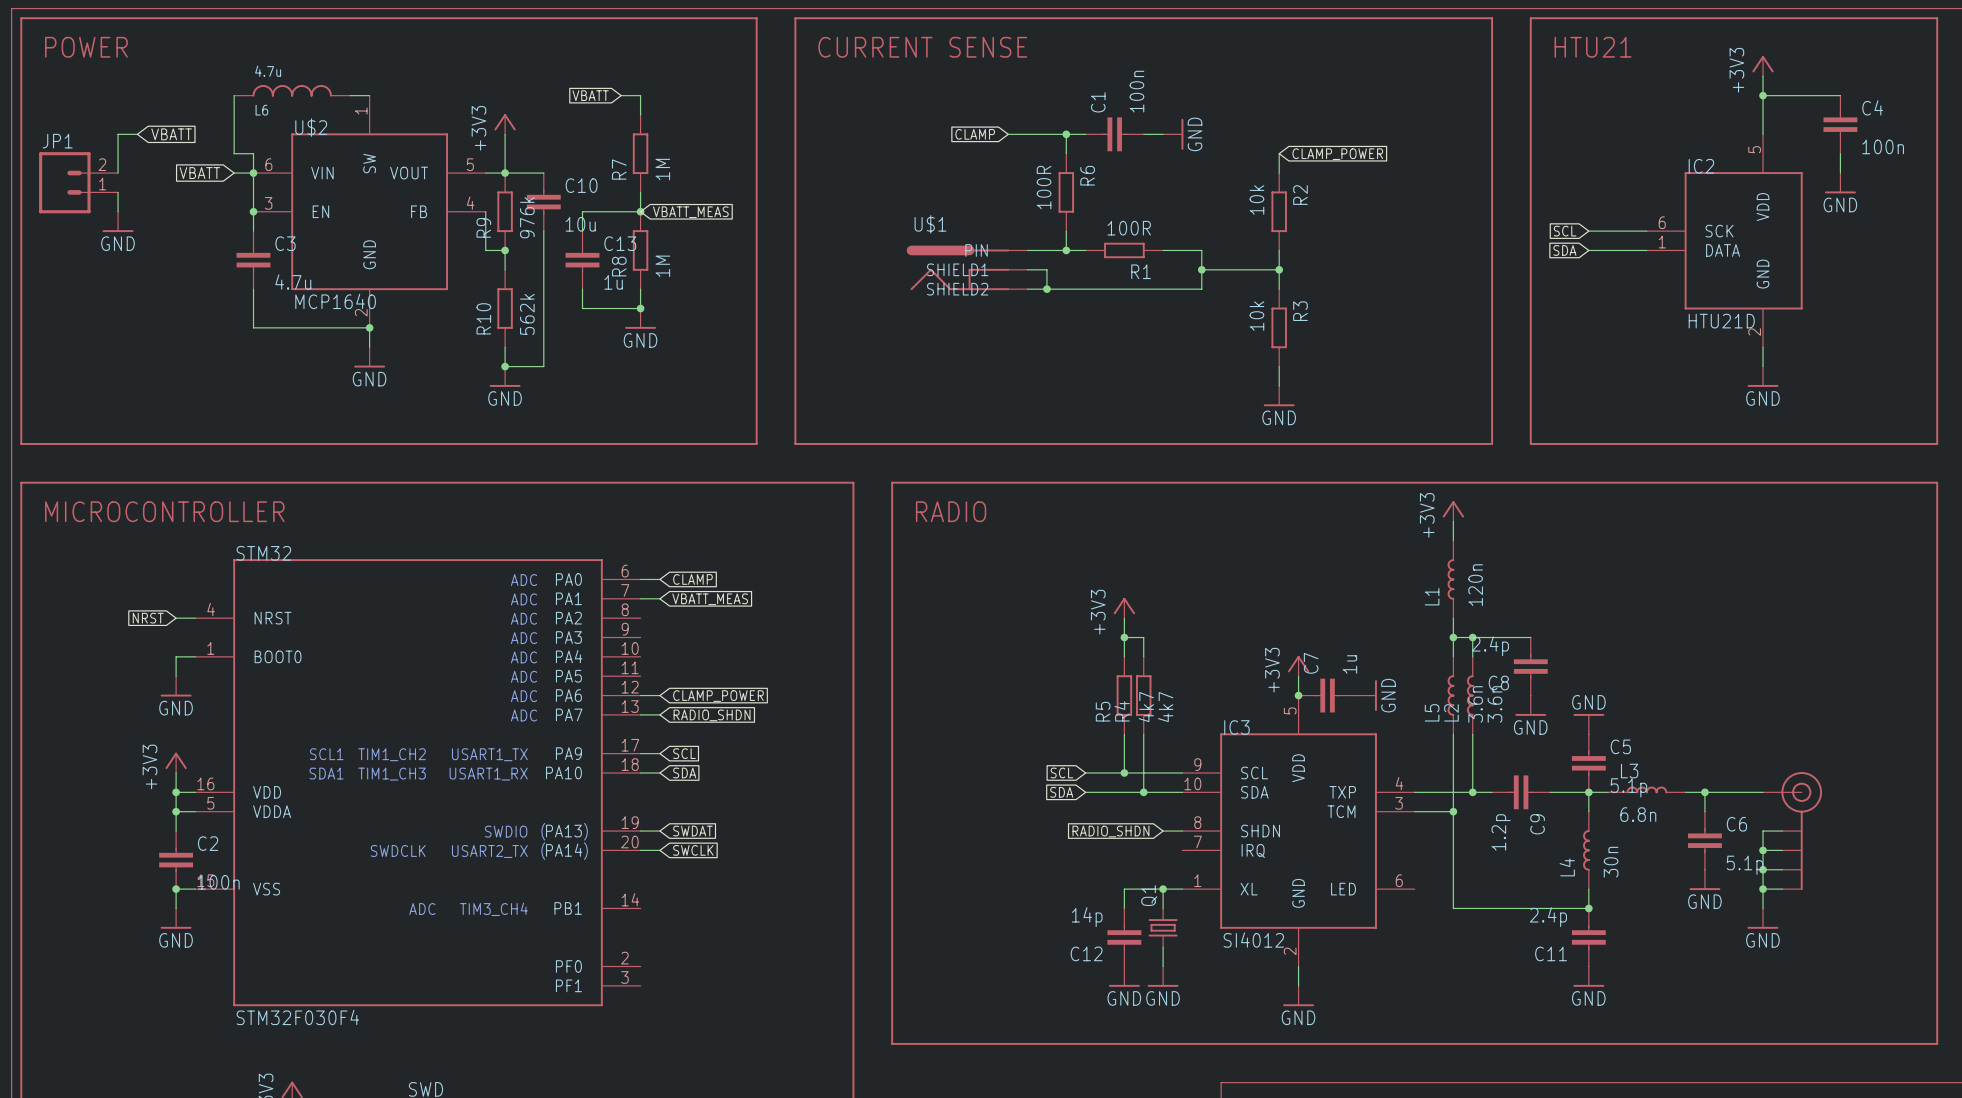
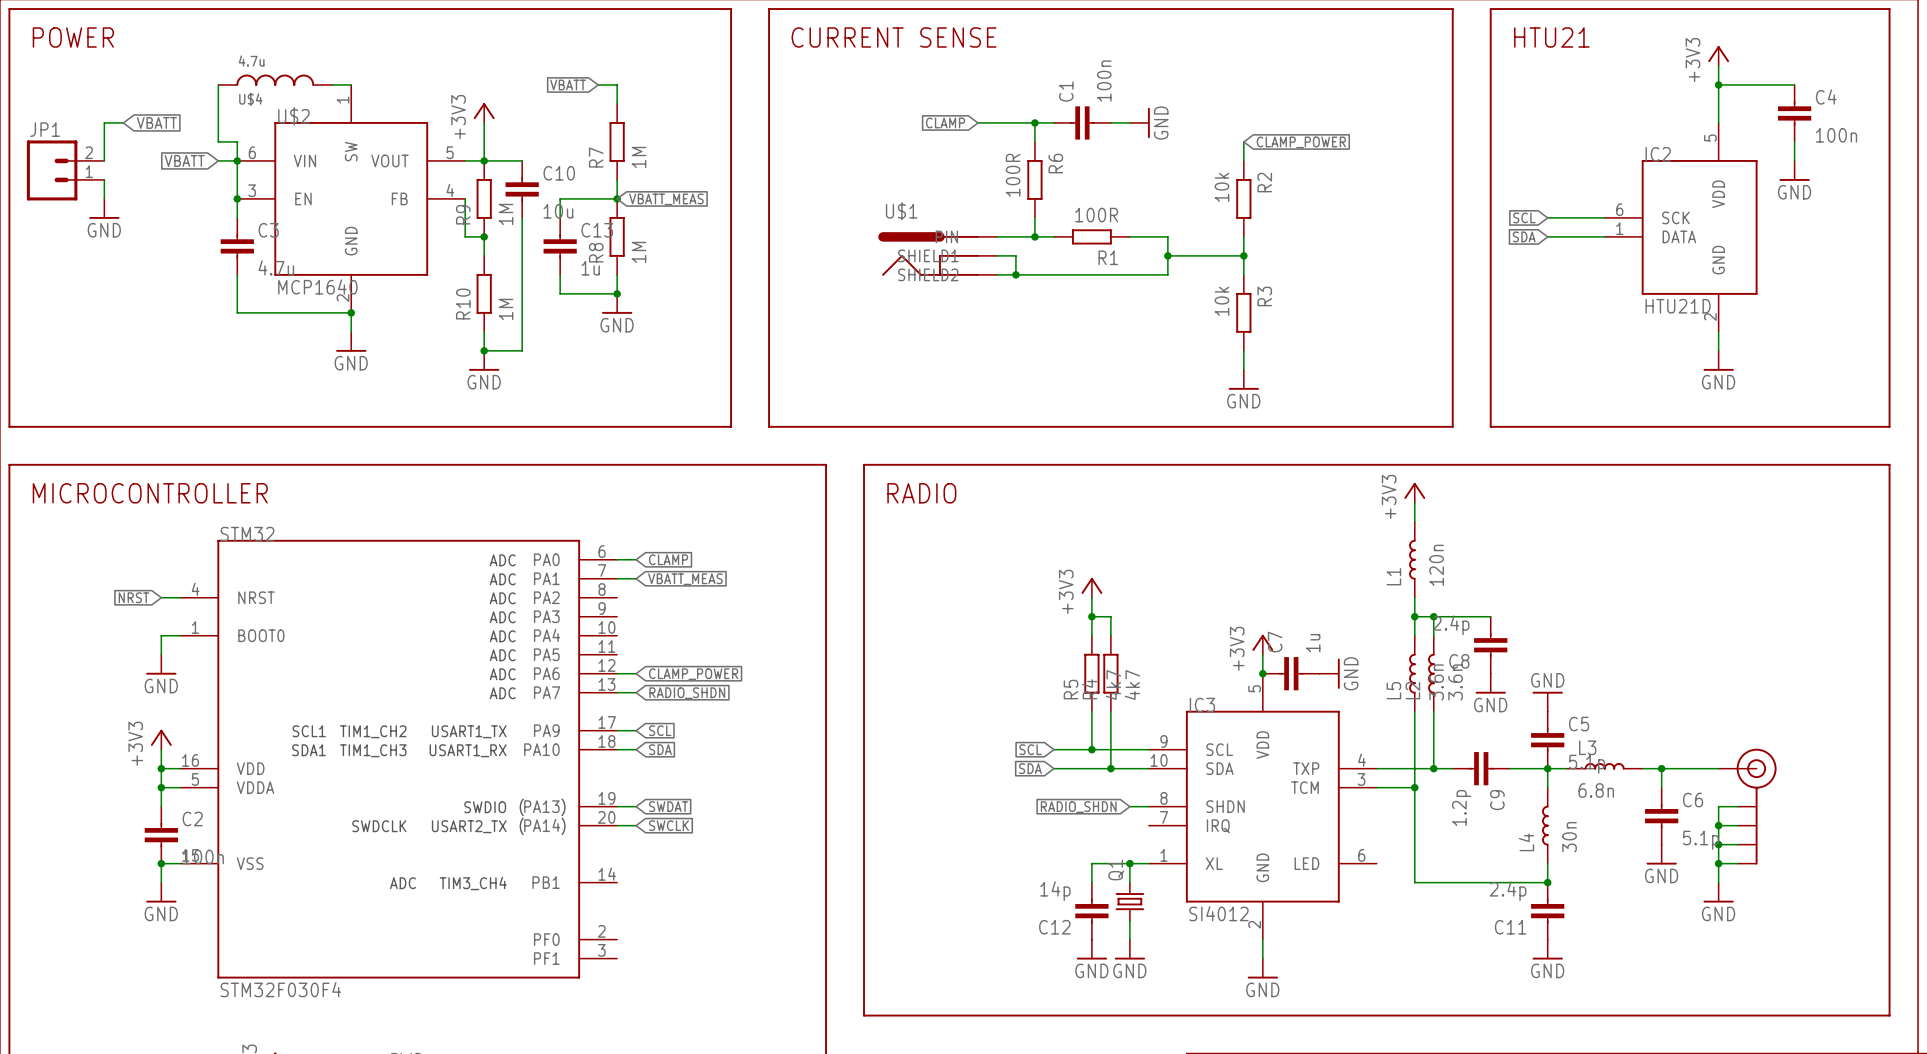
L6 name: L6 (261, 110) -> U$4 (250, 99)
R9 value: 976k (527, 217) -> 1M (506, 214)
R10 value: 562k (527, 314) -> 1M (506, 309)

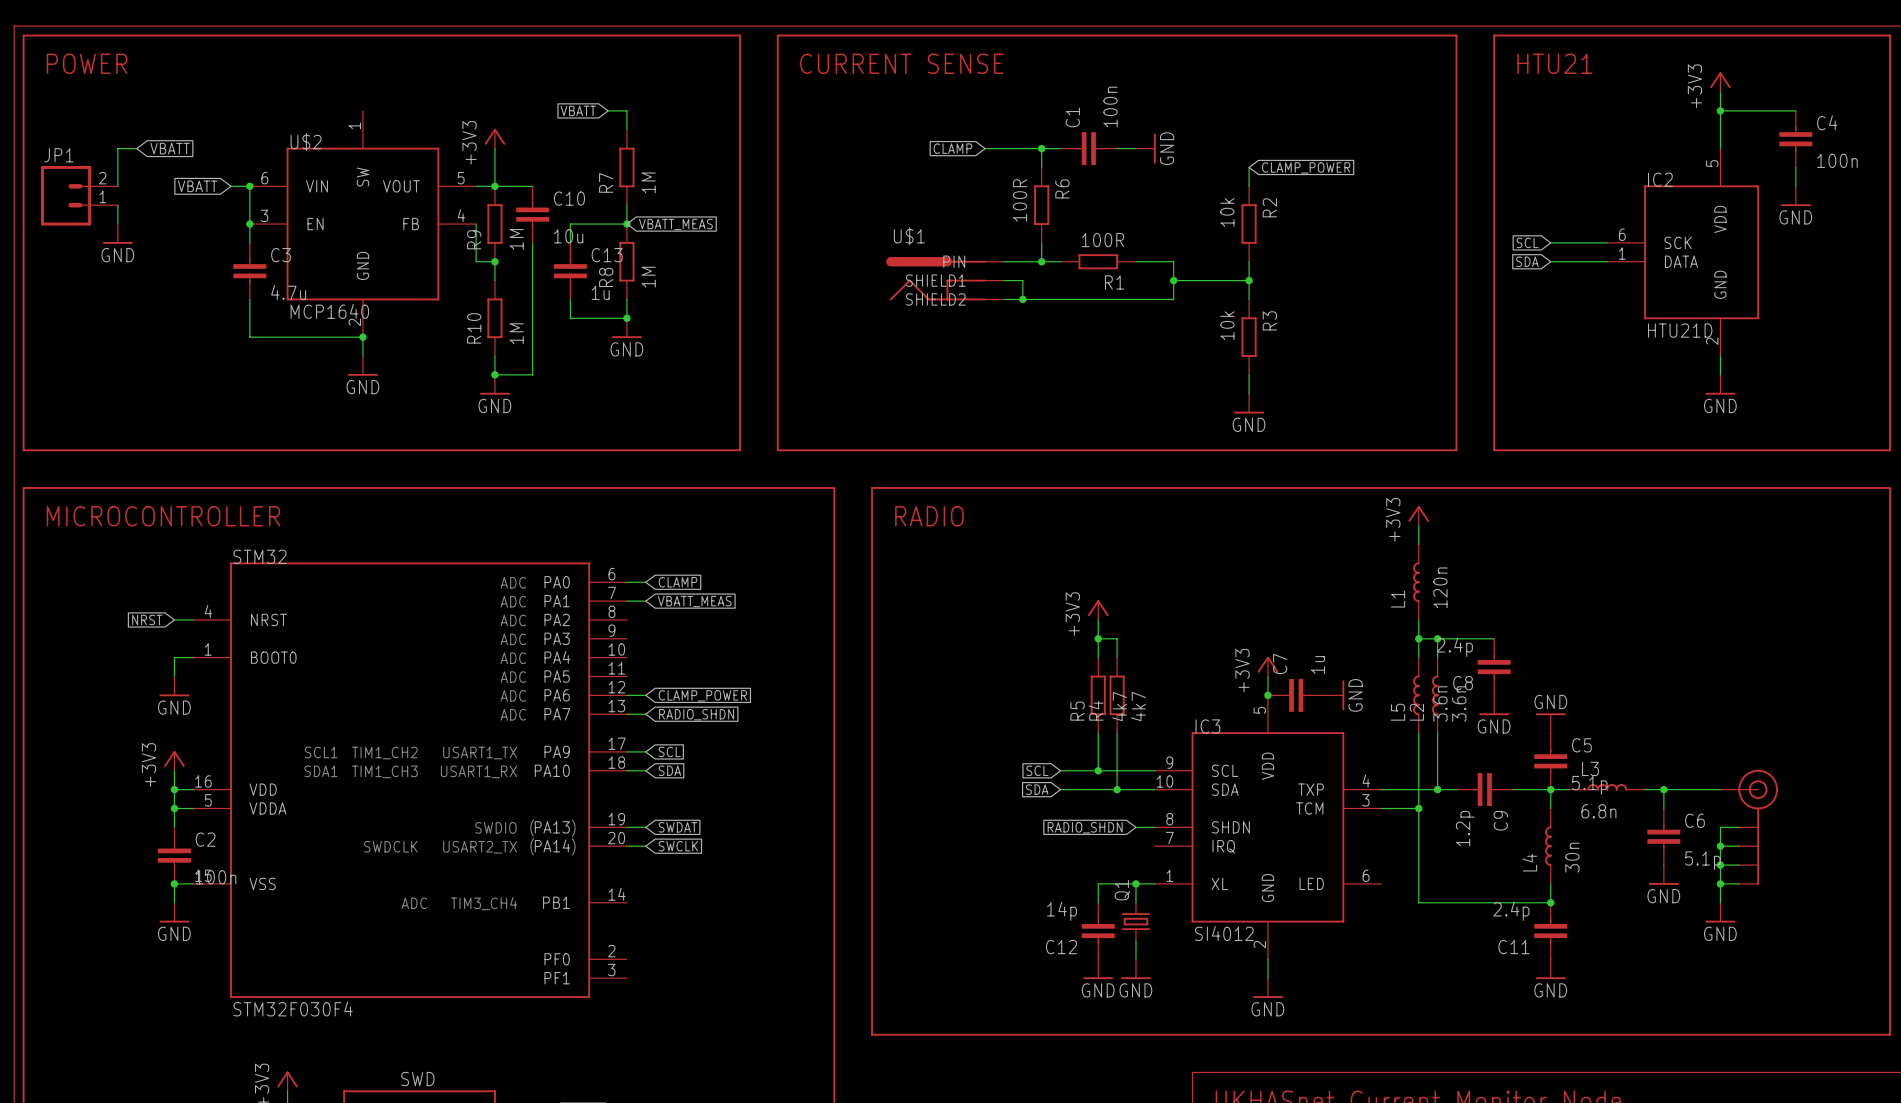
U$4: 4.7u (275, 80) -> none
wire: (218, 84) (218, 141) (237, 141) (237, 160) -> none
wire: (332, 84) (351, 84) -> none

